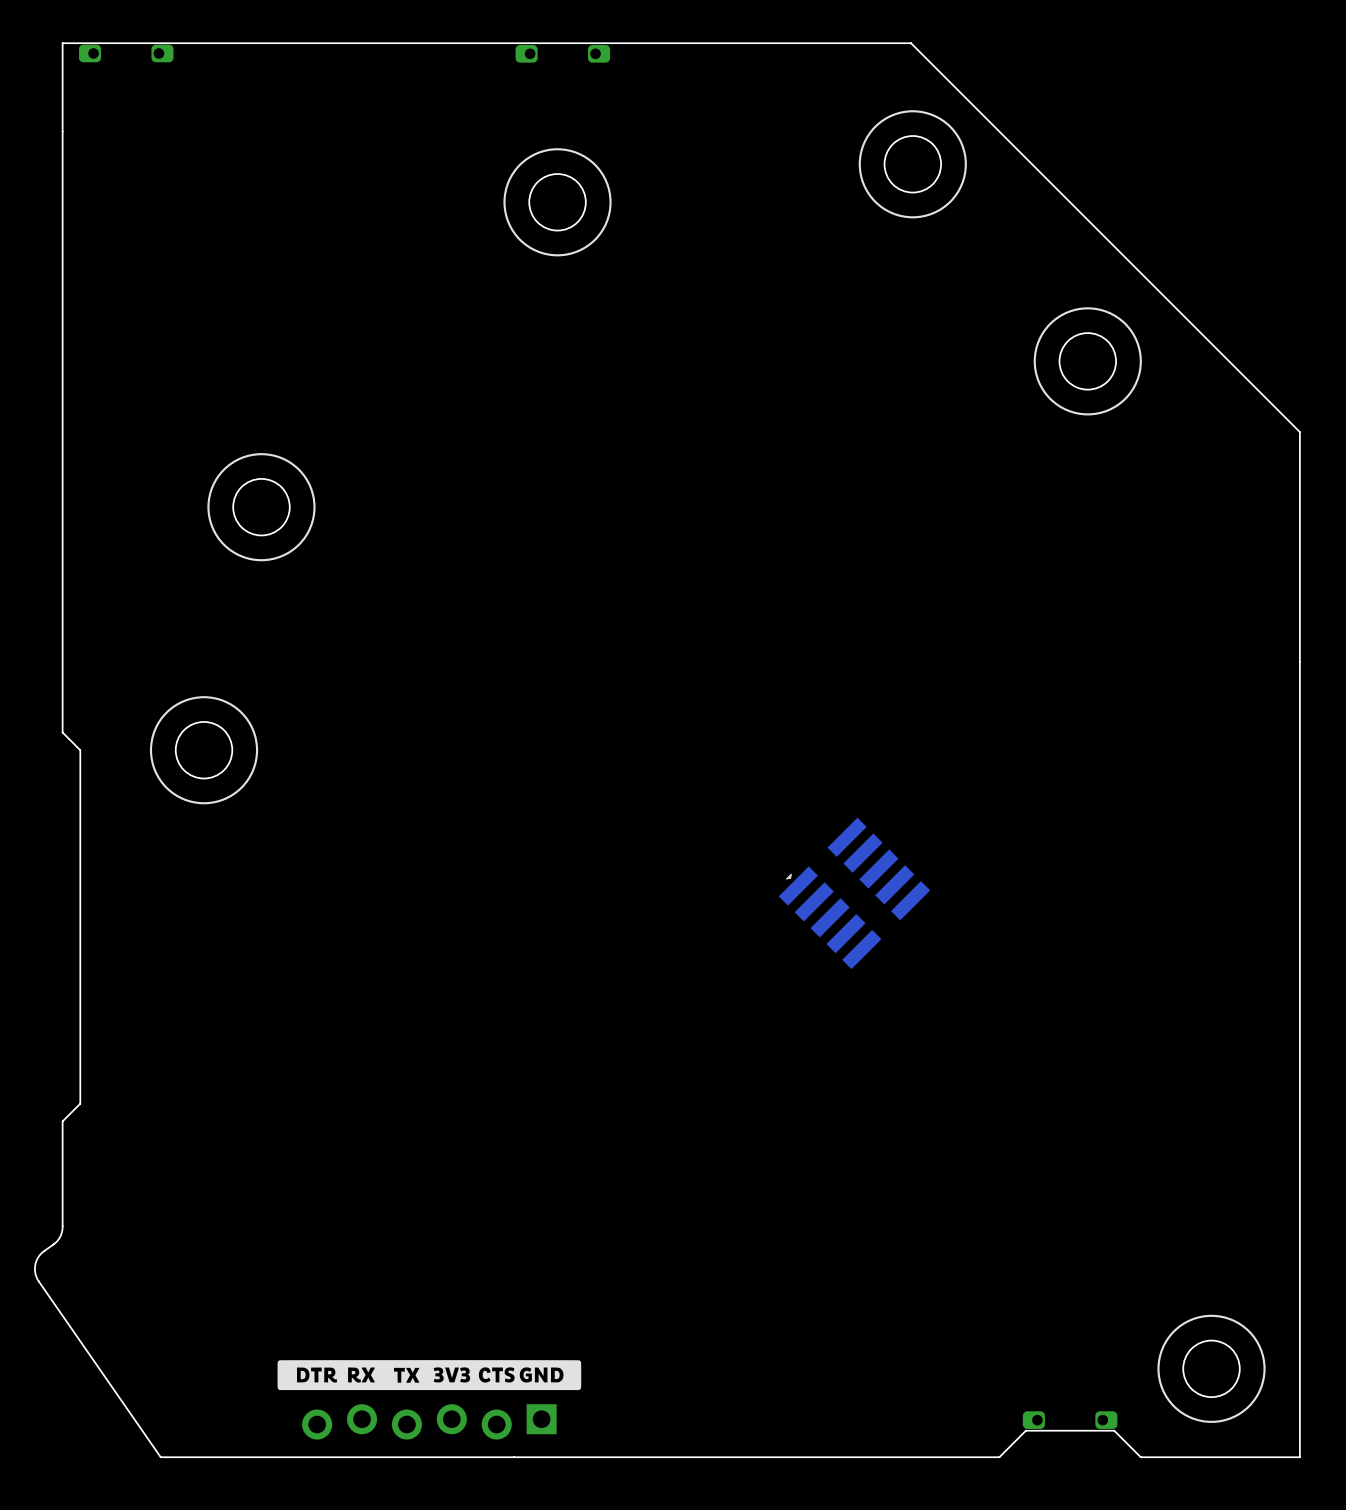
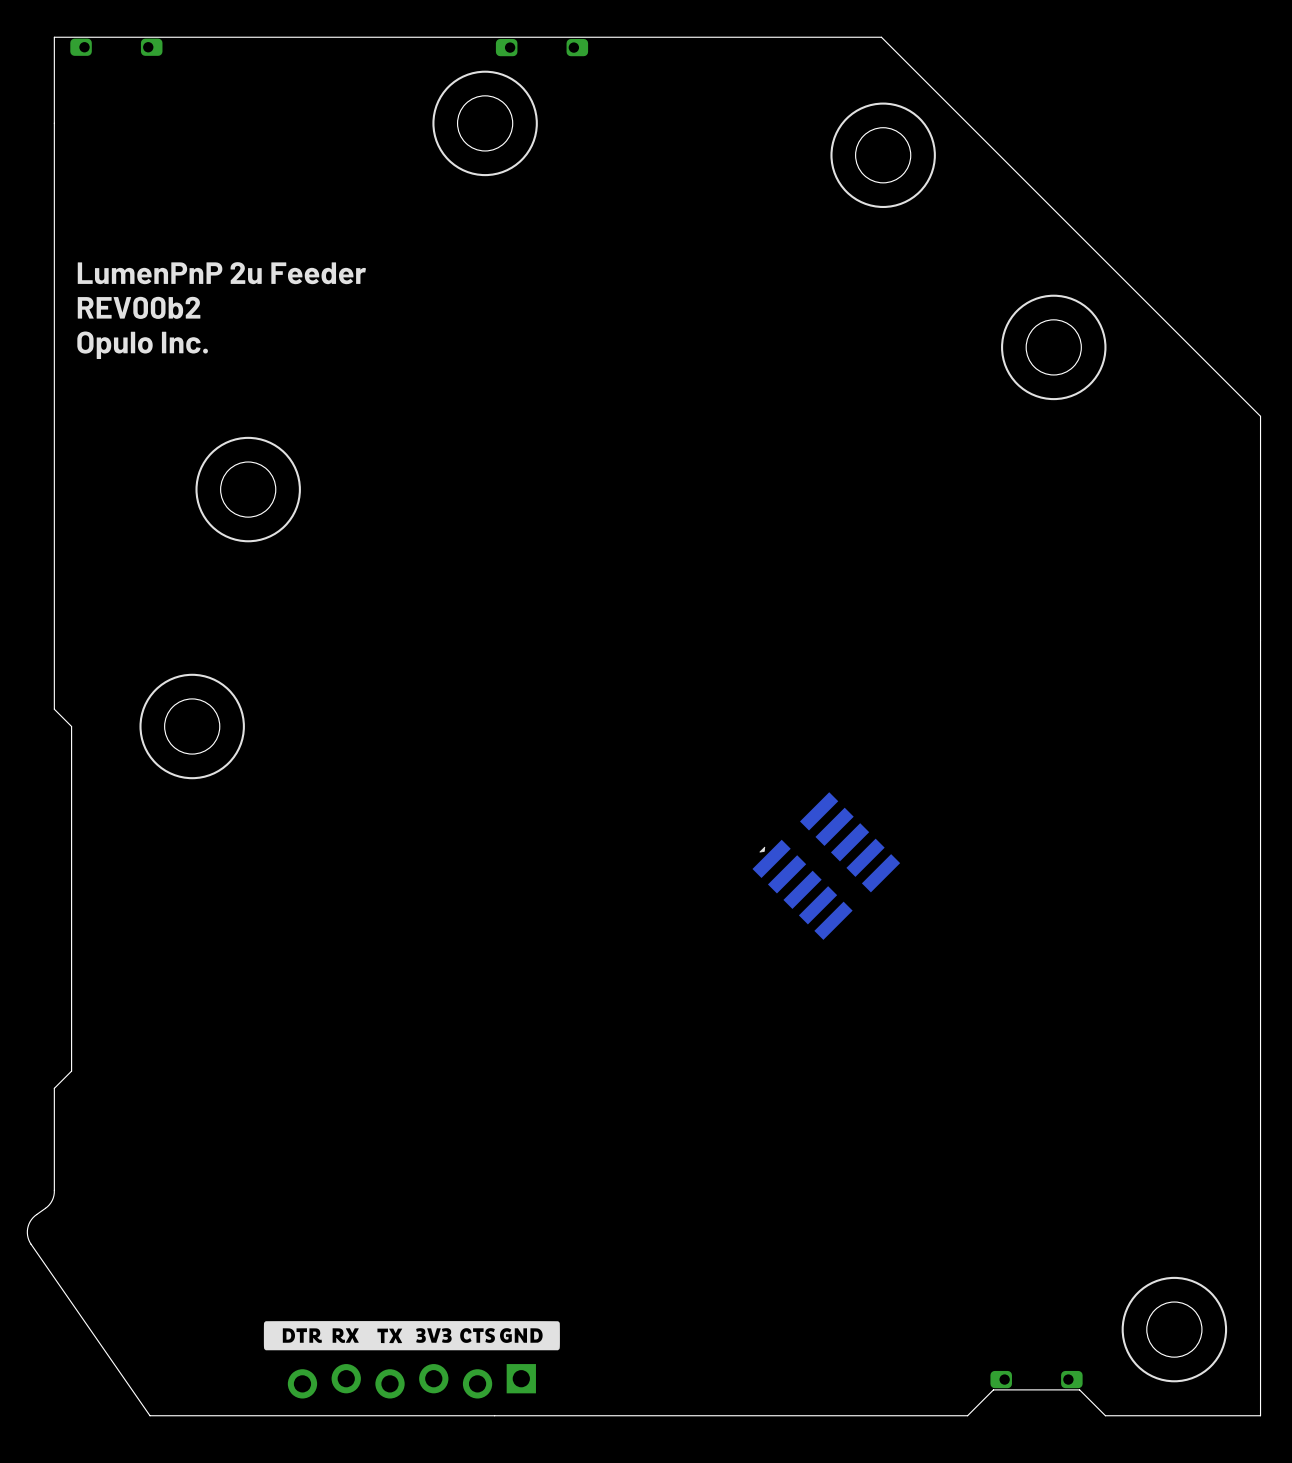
drawing position: (557, 202) -> (485, 123)
round board edge position: (557, 202) -> (485, 123)
text: none -> LumenPnP 2u Feeder (221, 273)
text: none -> REV00b2 (139, 307)
text: none -> Opulo Inc. (142, 345)

